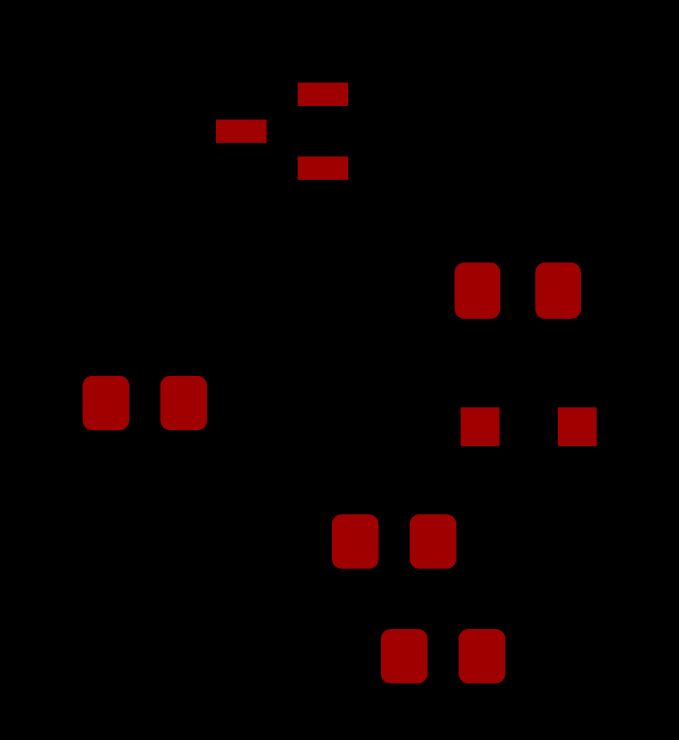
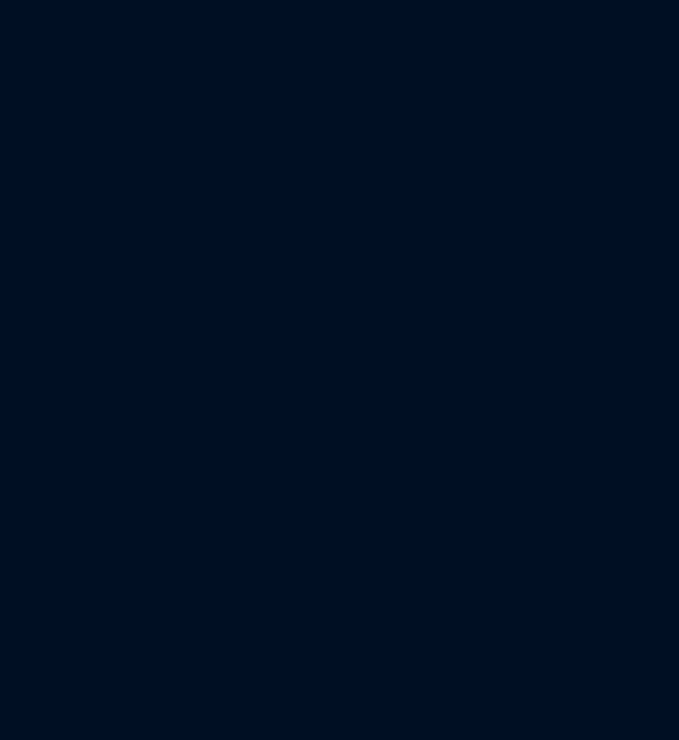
part: (282, 131) -> none
part: (517, 290) -> none
part: (144, 403) -> none
part: (528, 426) -> none
part: (394, 541) -> none
part: (443, 656) -> none

